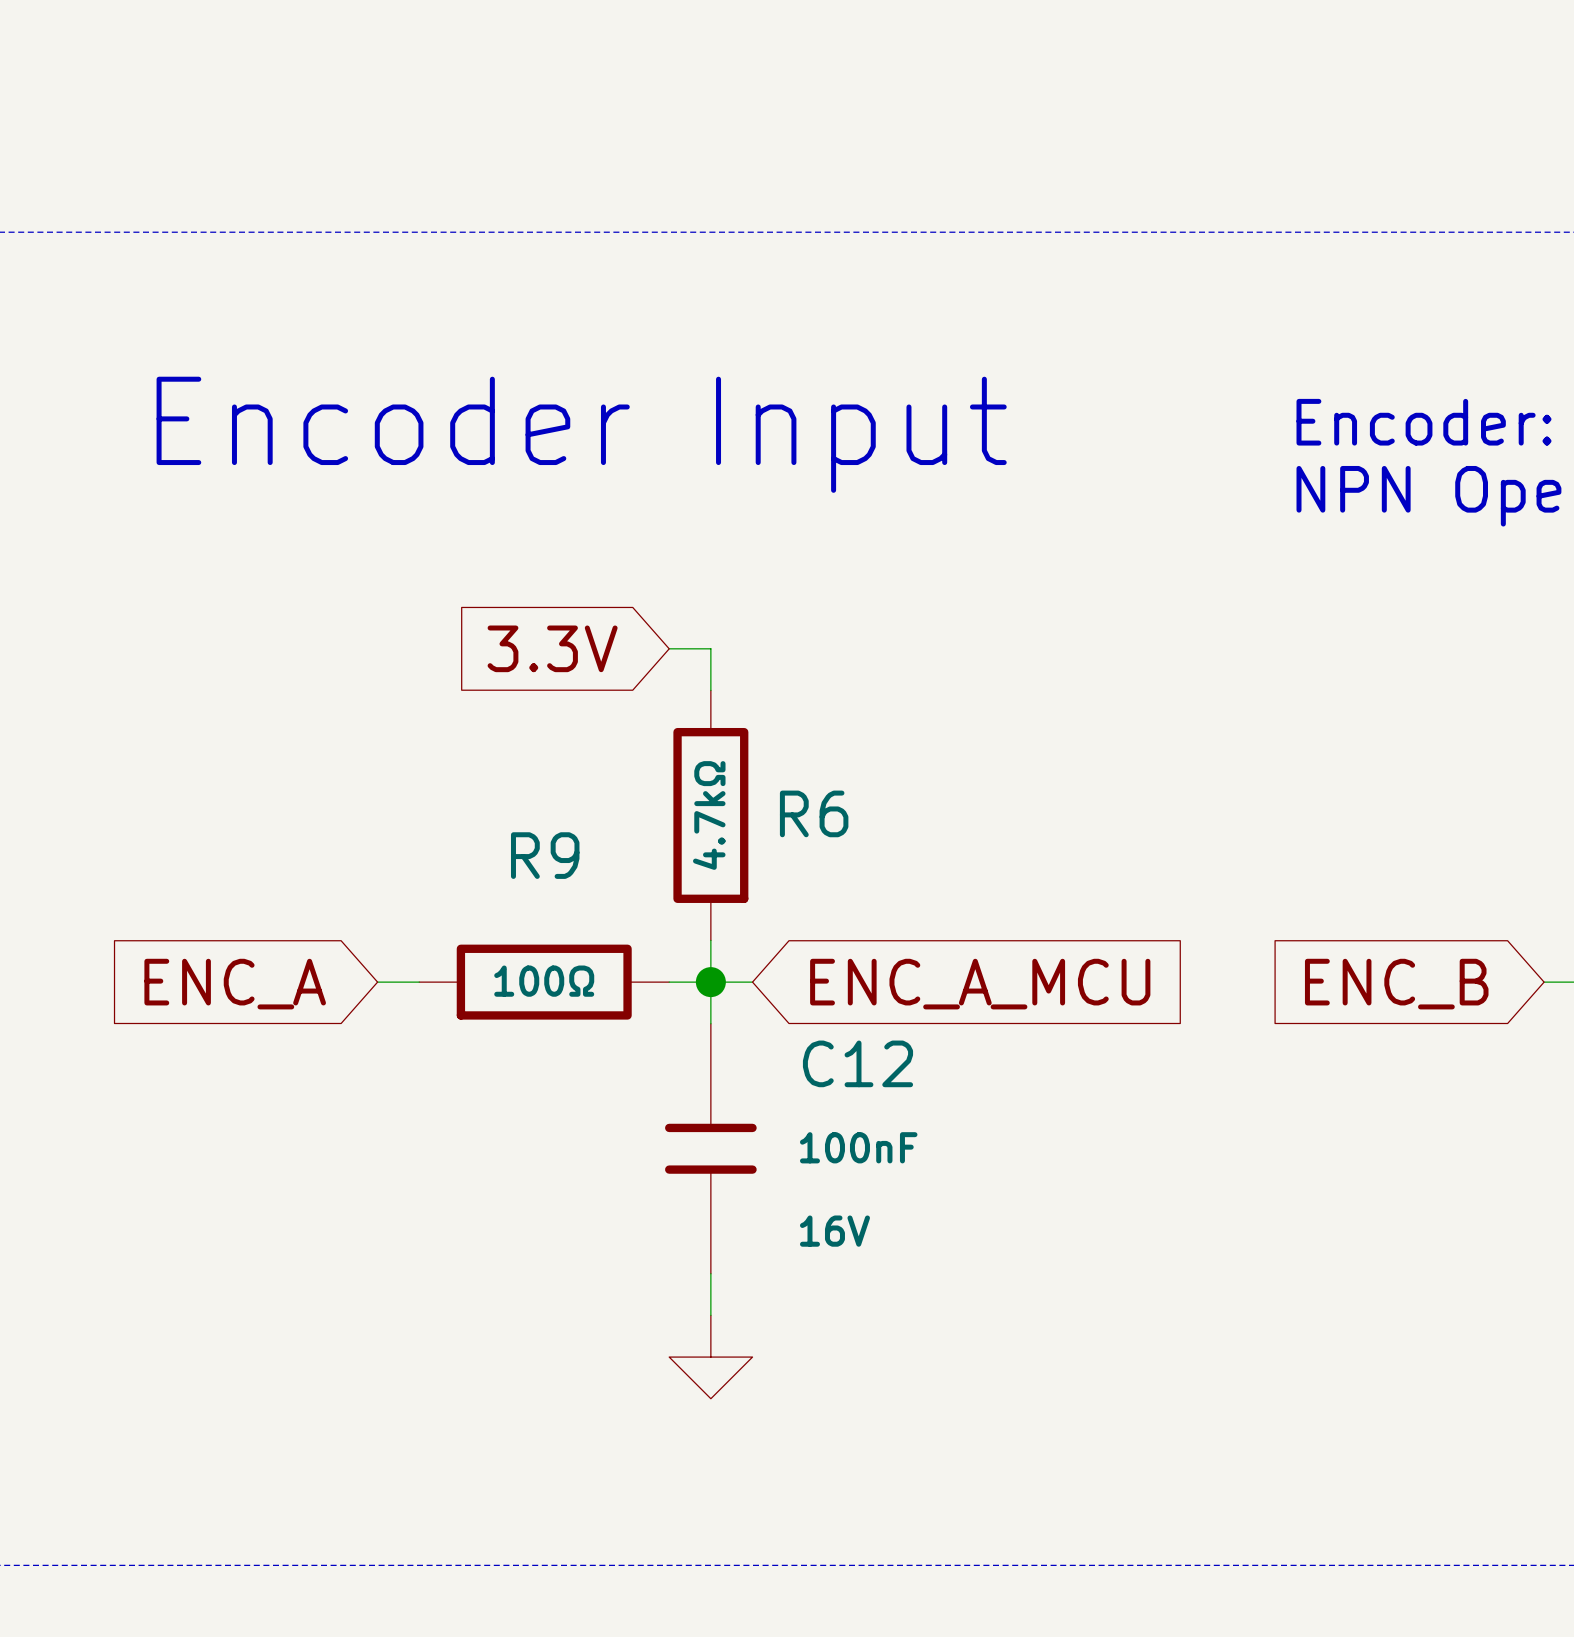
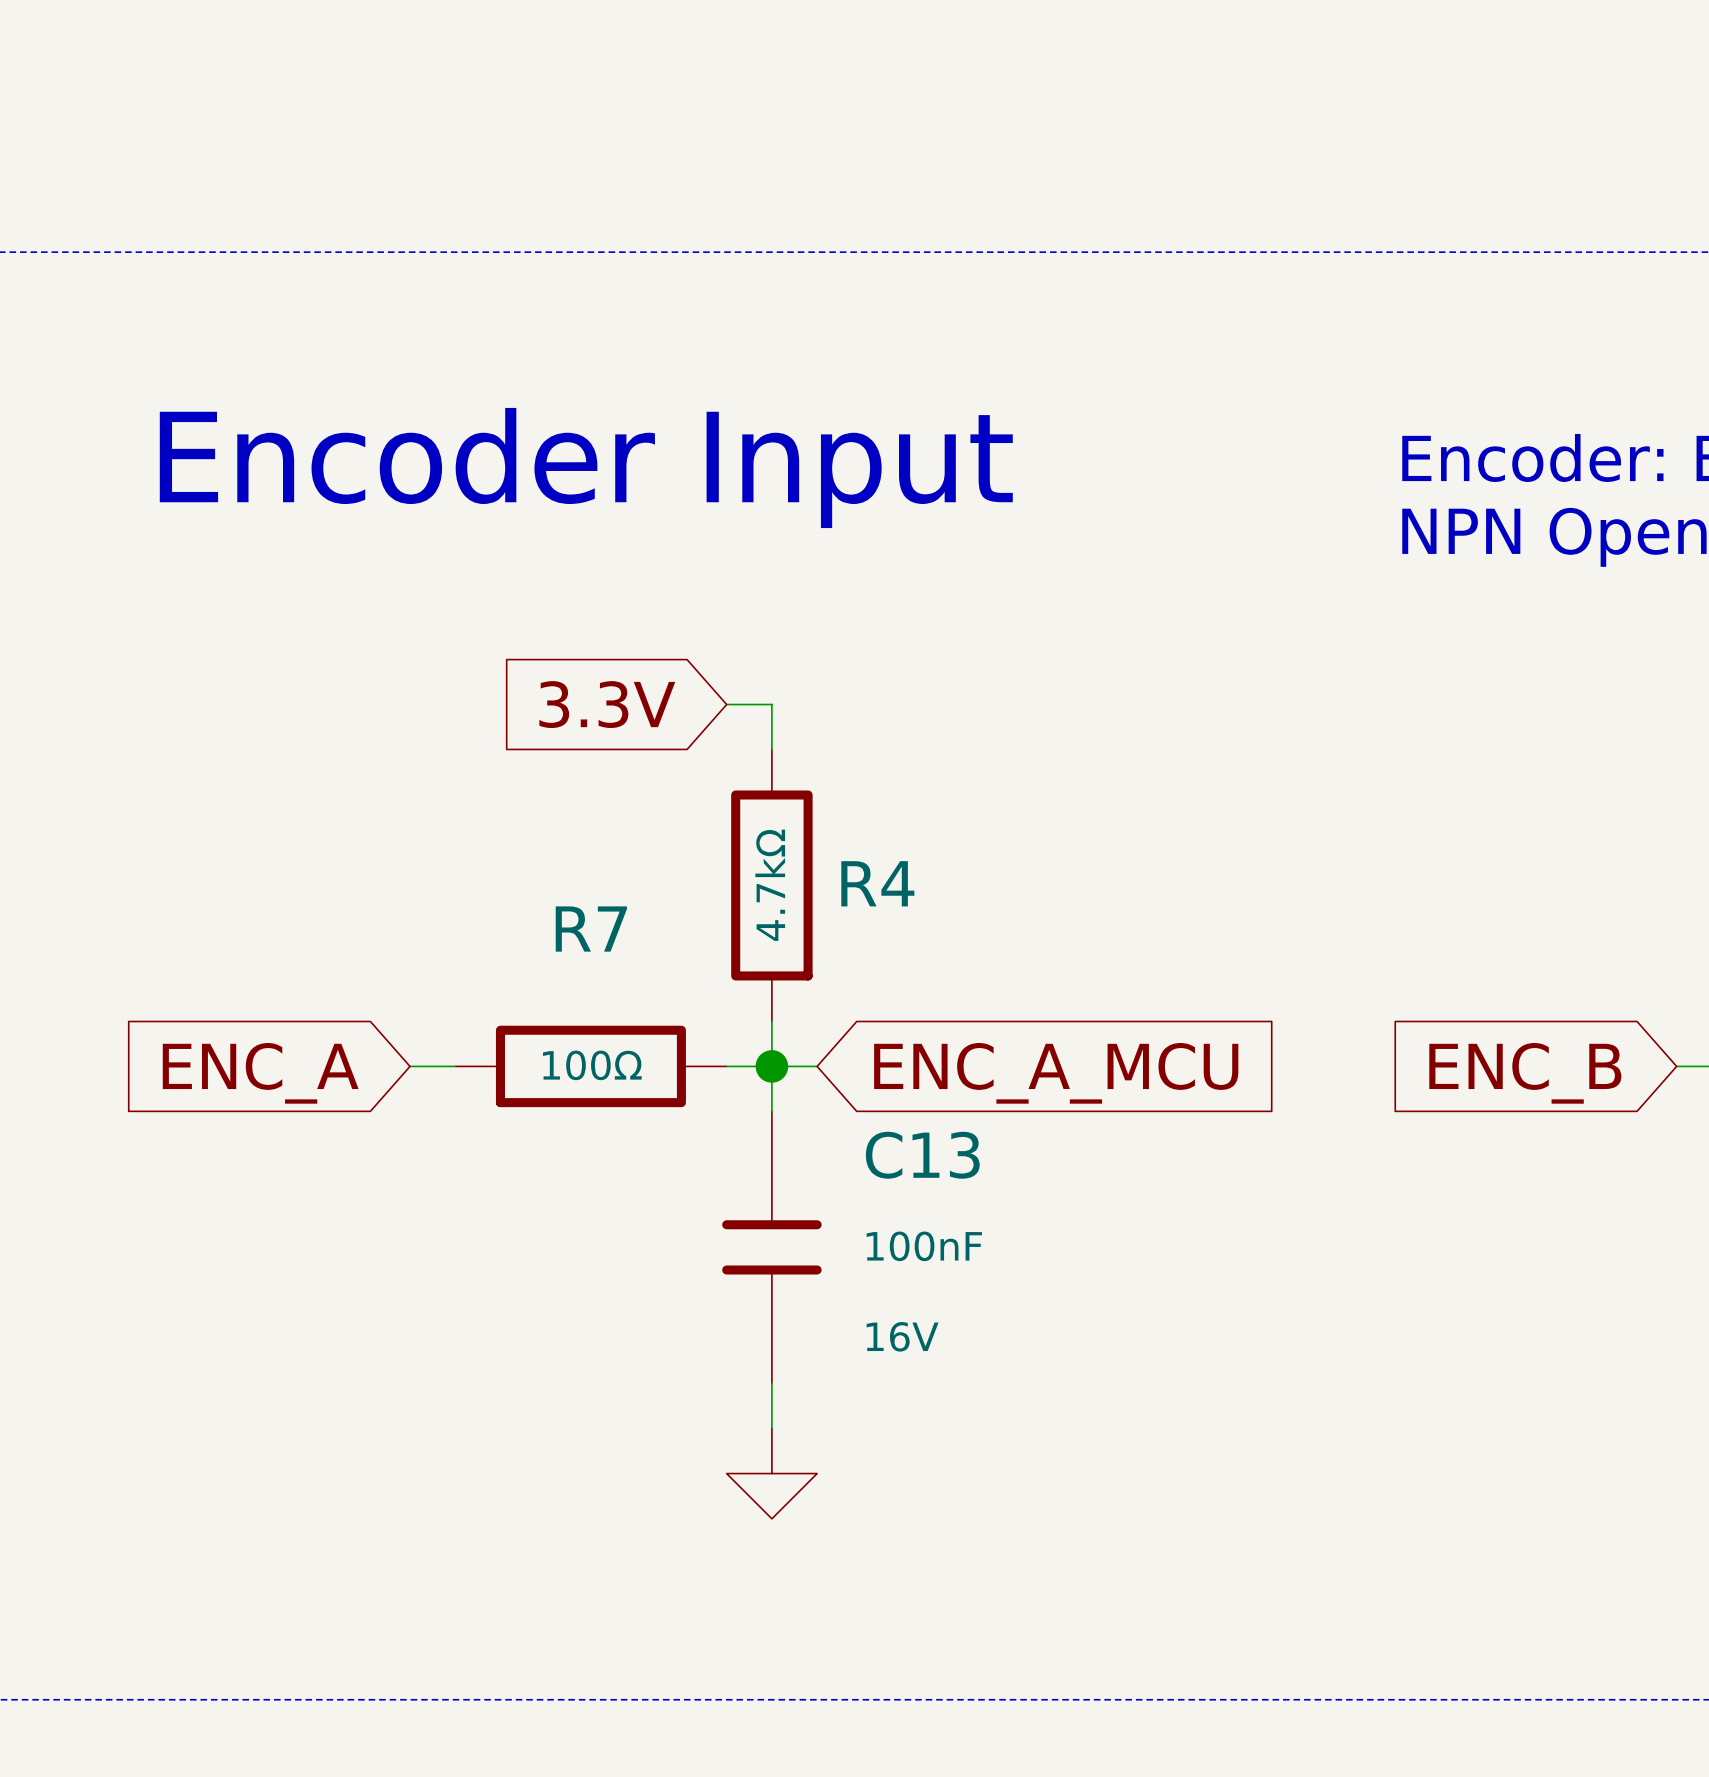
R6 name: R6 (814, 813) -> R4 (877, 883)
R9 name: R9 (545, 855) -> R7 (591, 929)
C12 name: C12 (857, 1063) -> C13 (922, 1155)

